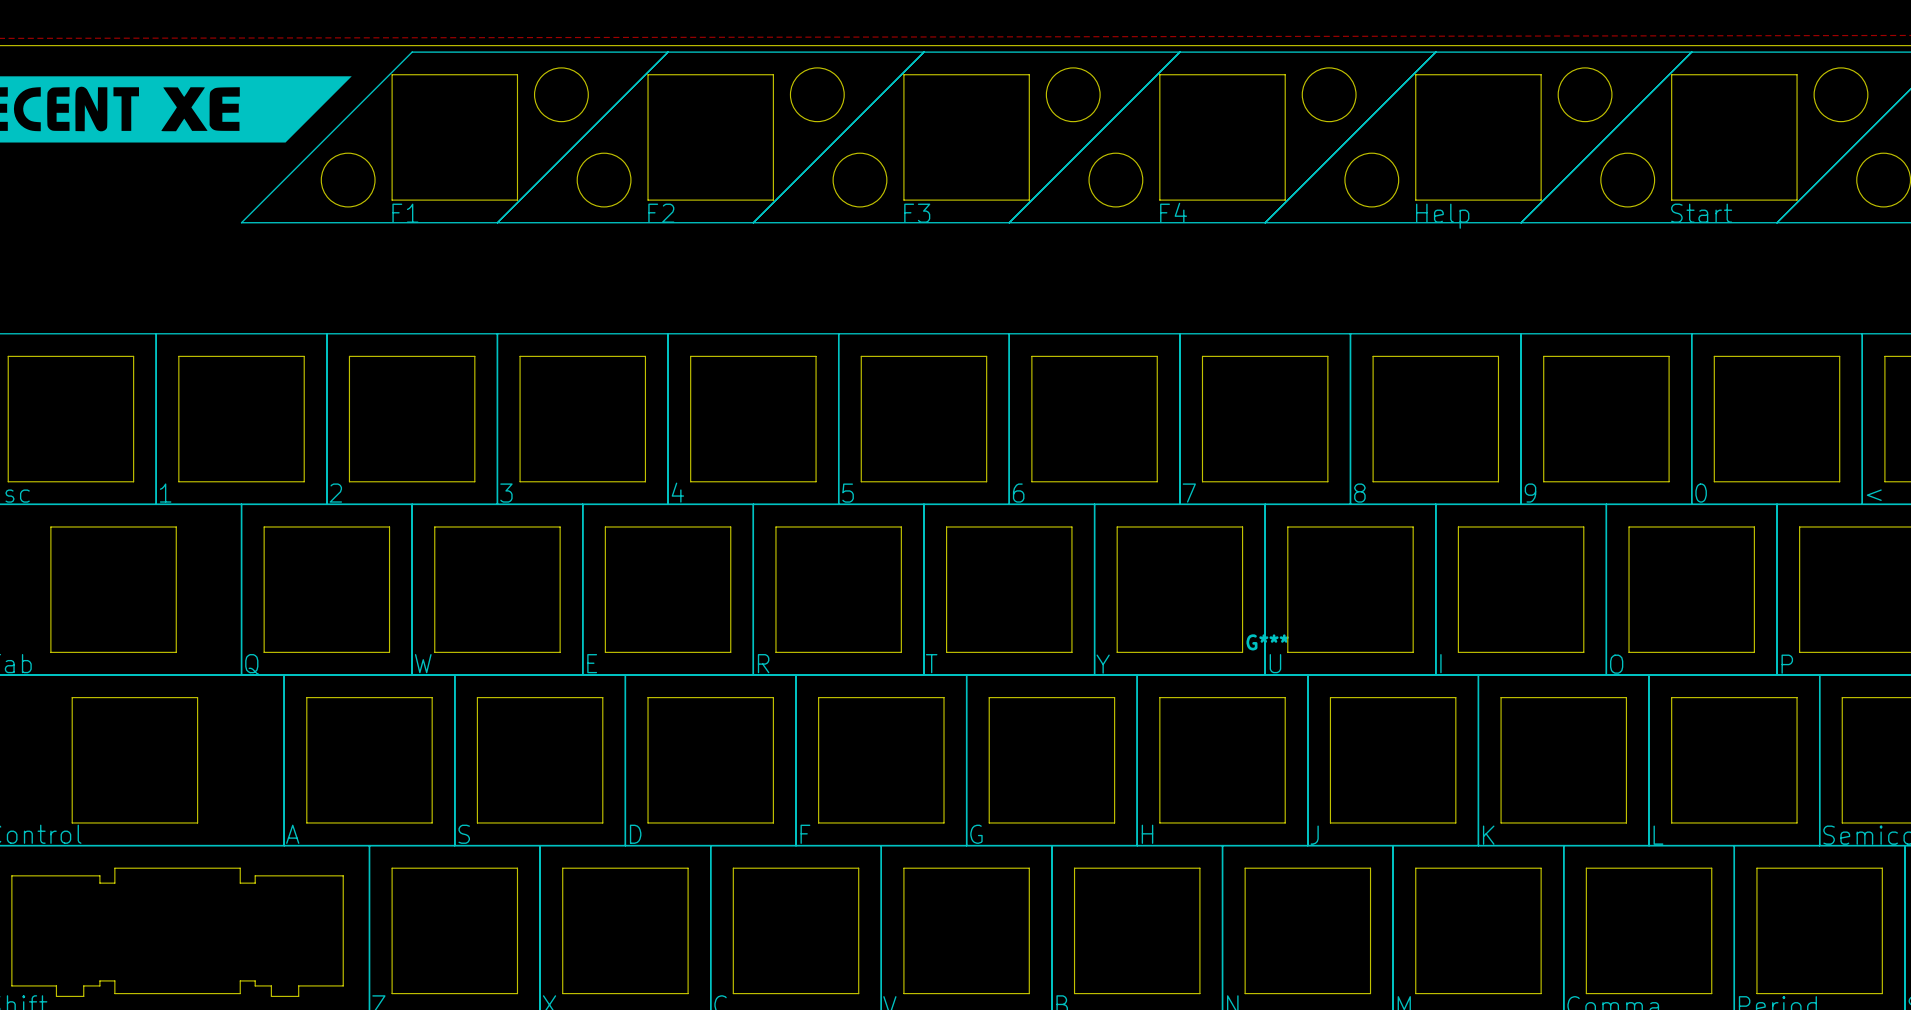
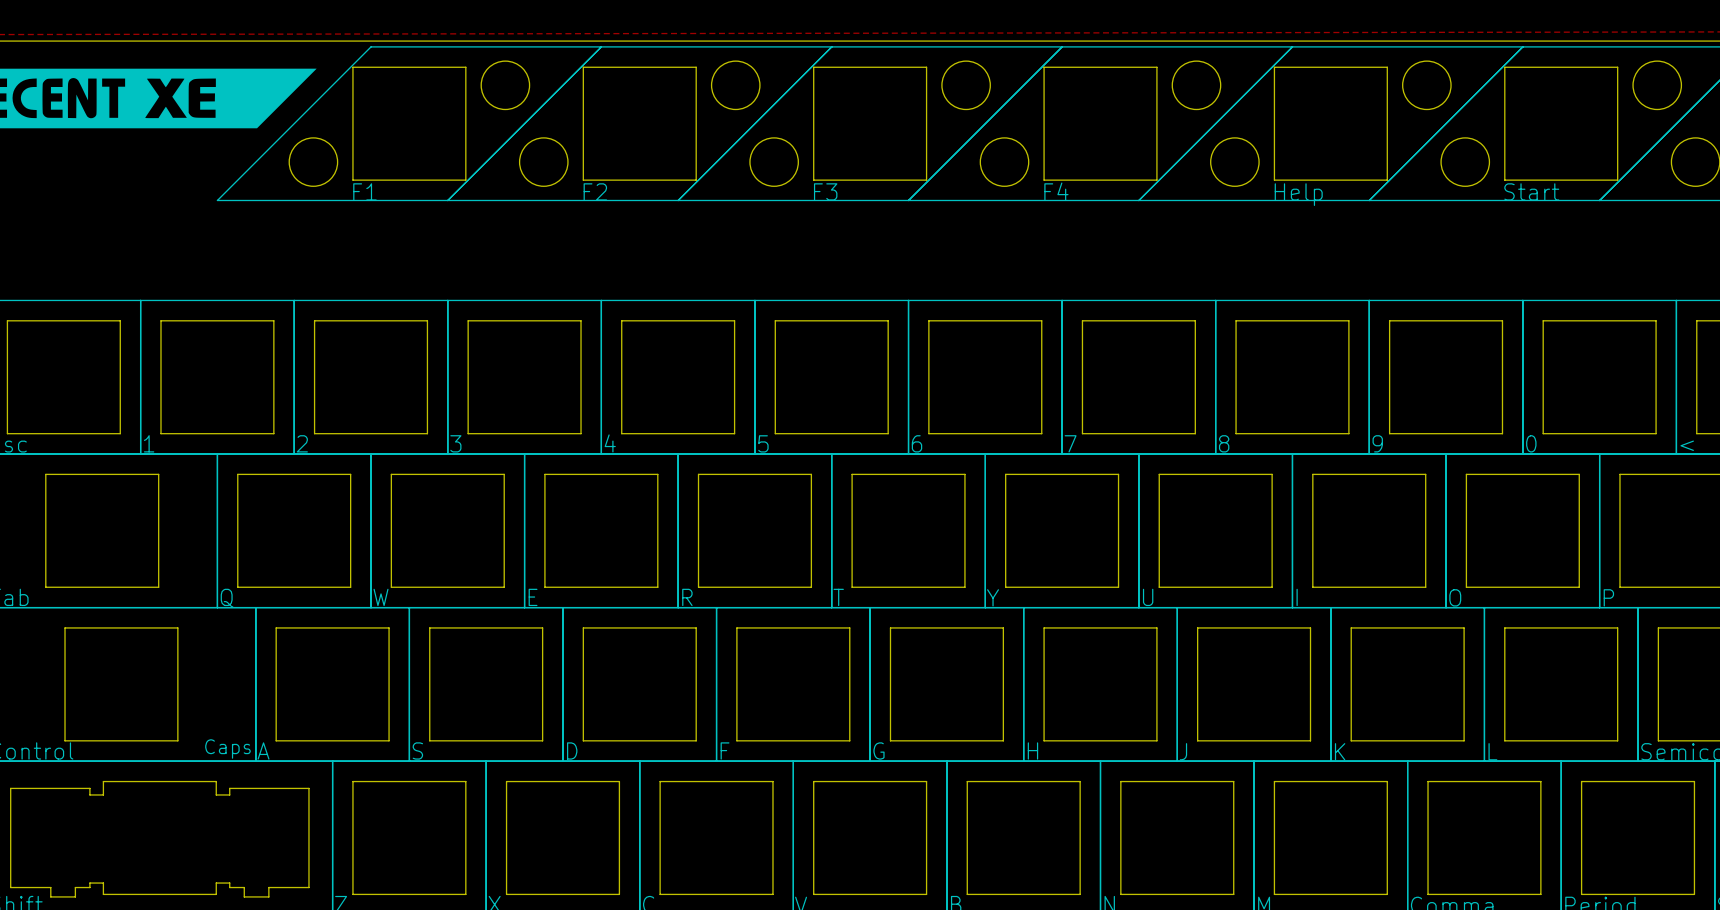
G***: (1267, 642) -> none
text: none -> Caps (227, 749)

